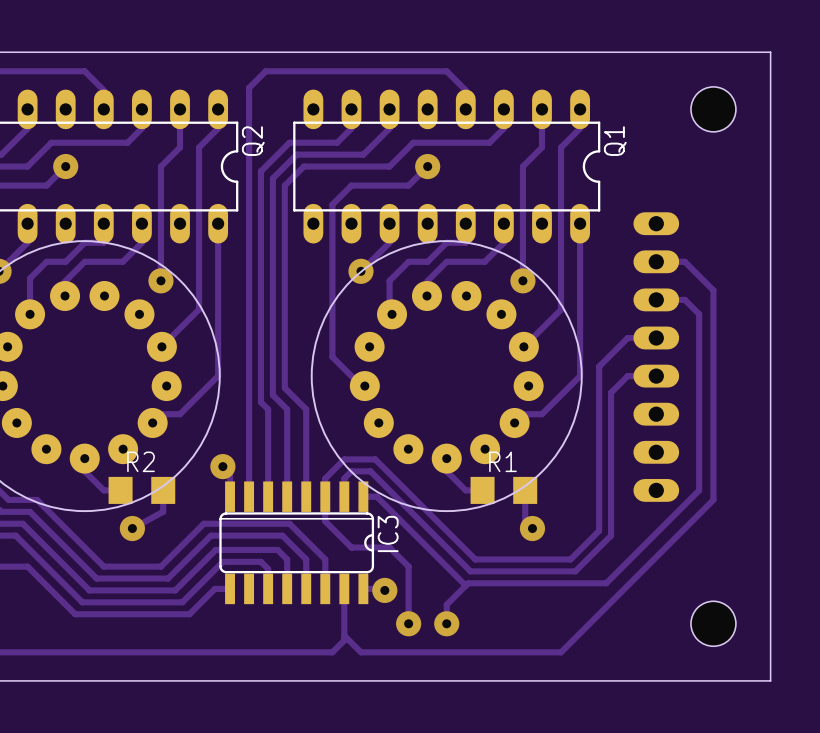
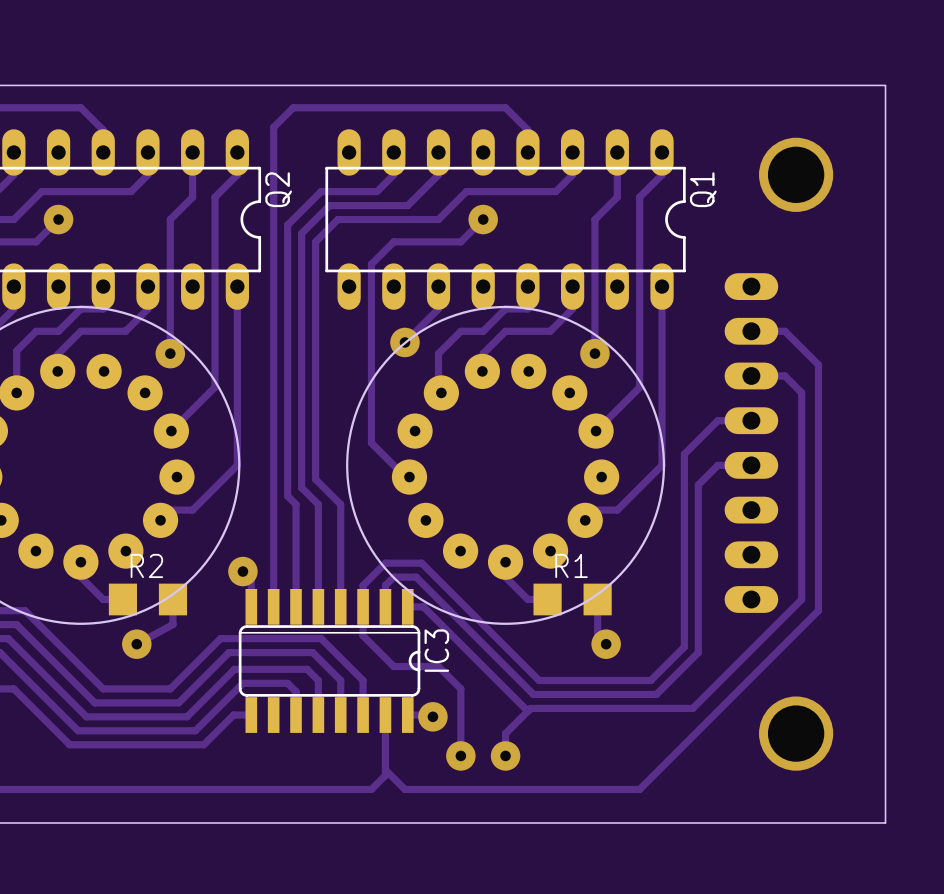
hole: (713, 109) -> none
via: none -> (796, 174)
via: none -> (796, 733)
hole: (713, 623) -> none

